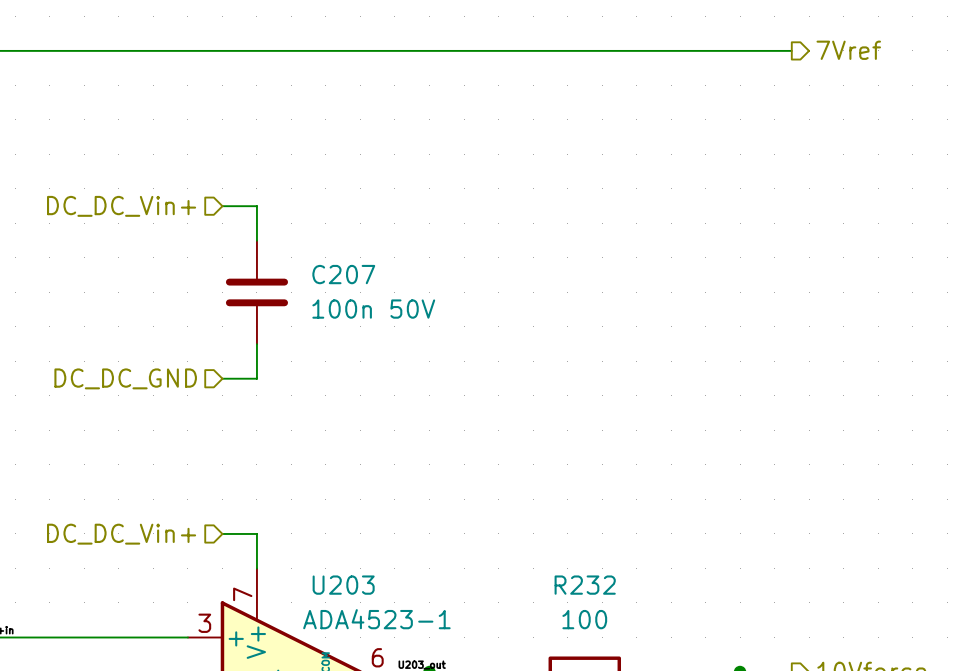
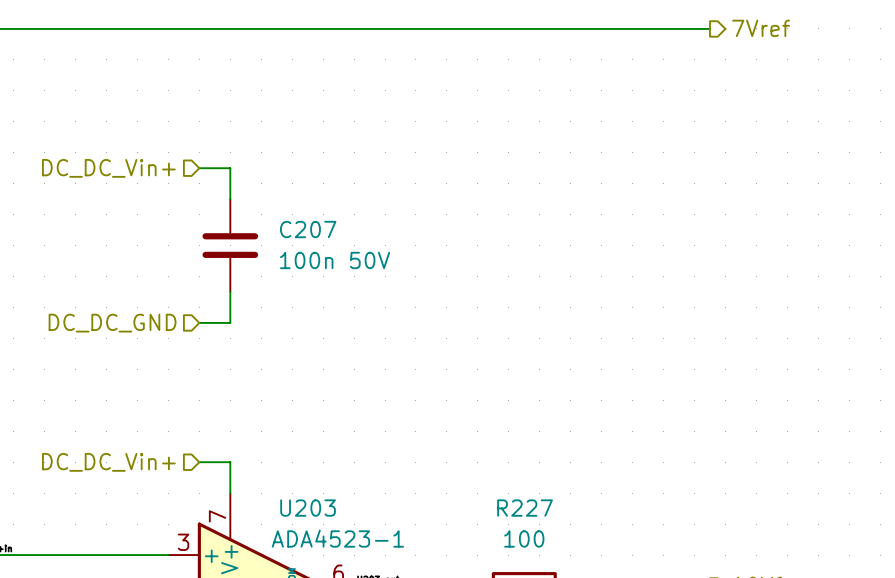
R232 name: R232 (585, 585) -> R227 (525, 508)

